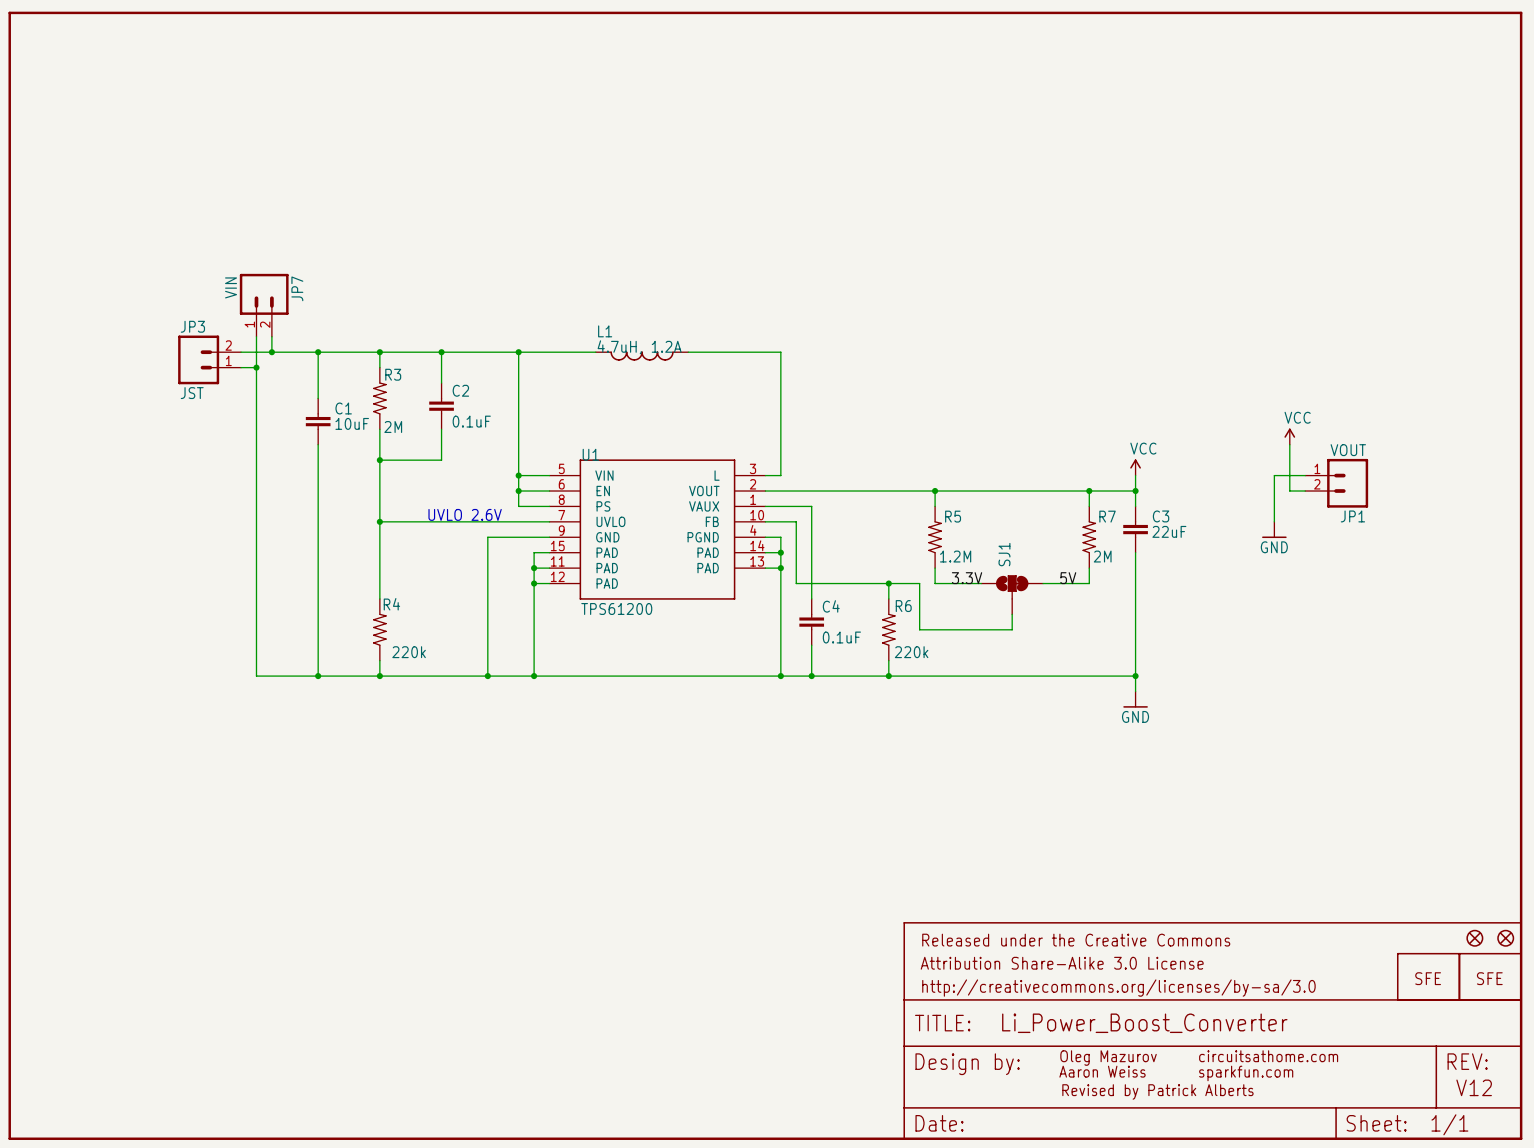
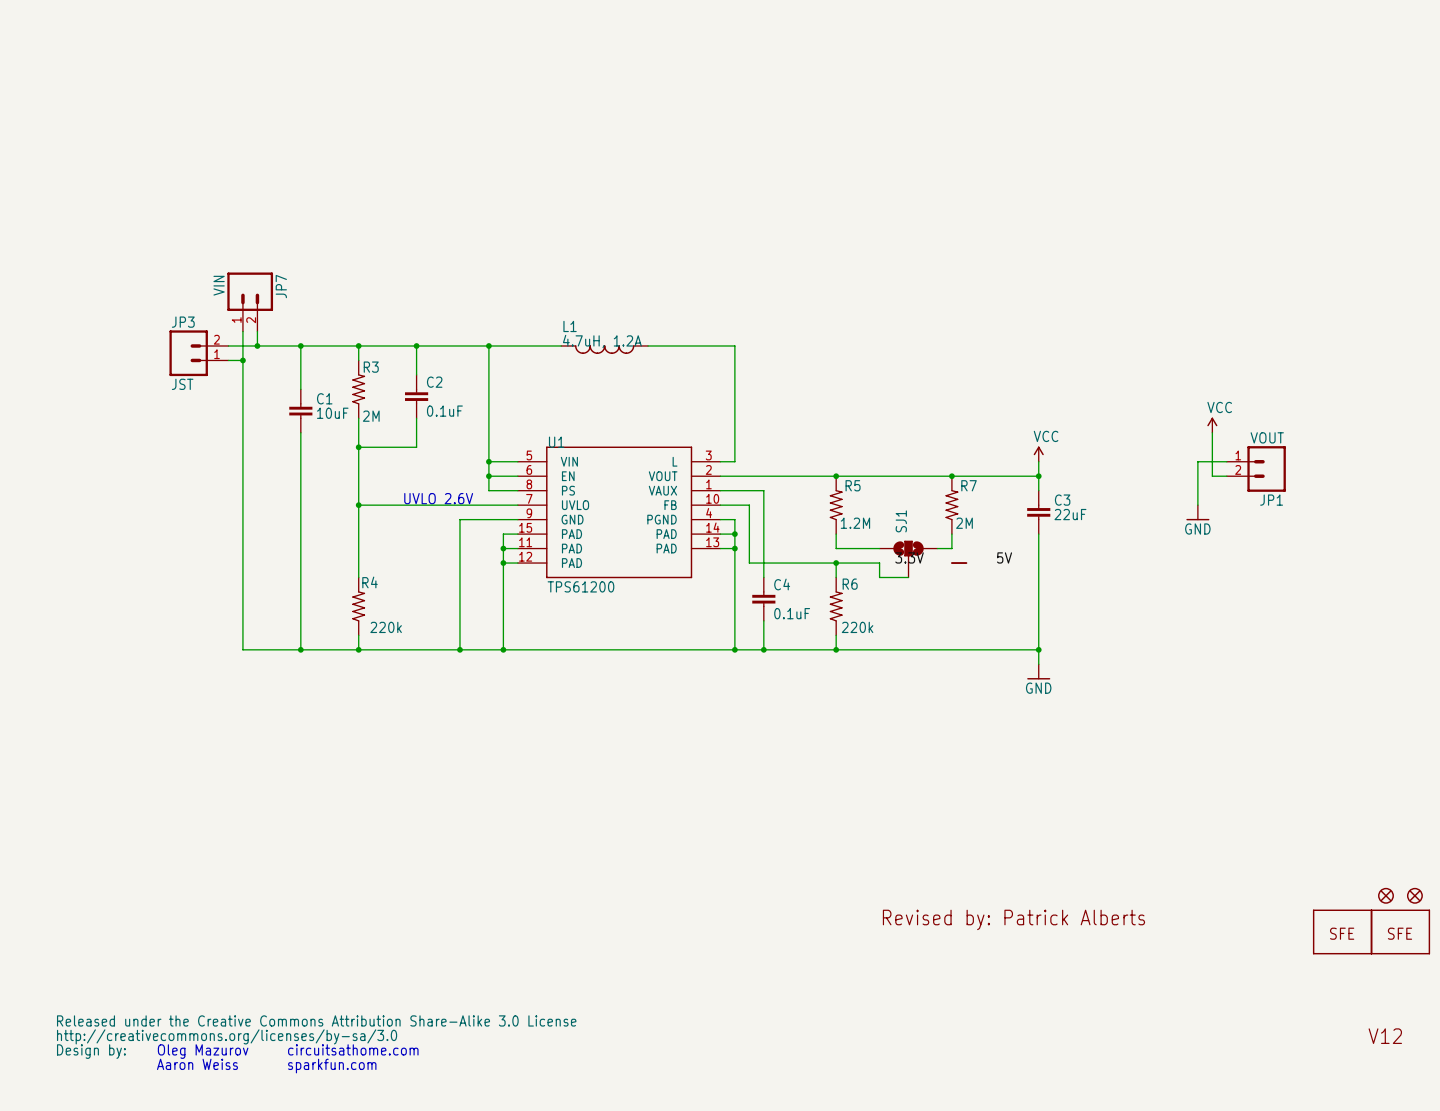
power symbol position: VCC (1135, 467) -> VCC (1038, 454)
wire: (1135, 475) (1135, 506) -> (1038, 461) (1038, 490)
junction: none -> (836, 476)
wire: (935, 491) (935, 506) -> none
junction: (935, 491) -> none
junction: none -> (951, 476)
wire: (1089, 491) (1089, 506) -> none
junction: (1089, 491) -> none
wire: (1104, 491) (1135, 491) -> none
junction: none -> (1038, 476)
junction: (1135, 491) -> none
C3 position: (1135, 529) -> (1038, 512)
R5 position: (935, 537) -> (836, 505)
R7 position: (1089, 537) -> (951, 505)
wire: none -> (951, 534) (951, 548) (937, 548)
wire: (1135, 552) (1135, 691) -> (1038, 534) (1038, 664)
wire: (935, 568) (935, 583) (981, 583) -> (879, 548) (836, 548) (836, 534)
wire: (1089, 568) (1089, 583) (1043, 583) -> none
part: (765, 575) -> none
wire: (919, 583) (919, 629) (1012, 629) (1012, 614) -> (865, 563) (879, 563) (879, 577) (908, 577)
SJ1 position: (1012, 594) -> (908, 559)
wire: (1104, 676) (1135, 676) -> none
junction position: (1135, 676) -> (1038, 649)
power symbol position: GND (1135, 699) -> GND (1038, 671)
text: none -> Revised by: Patrick Alberts (1013, 919)
part: (1212, 1030) -> none
text: circuitsathome.com (1268, 1056) -> none
text: Oleg Mazurov (1108, 1058) -> none
text: Aaron Weiss (1102, 1071) -> none
text: sparkfun.com (1246, 1073) -> none
part: none -> (316, 1037)
text: Revised by Patrick Alberts (1157, 1091) -> none
text: none -> circuitsathome.com (353, 1049)
text: none -> Oleg Mazurov (203, 1051)
text: none -> Aaron Weiss (197, 1064)
text: none -> sparkfun.com (332, 1066)

